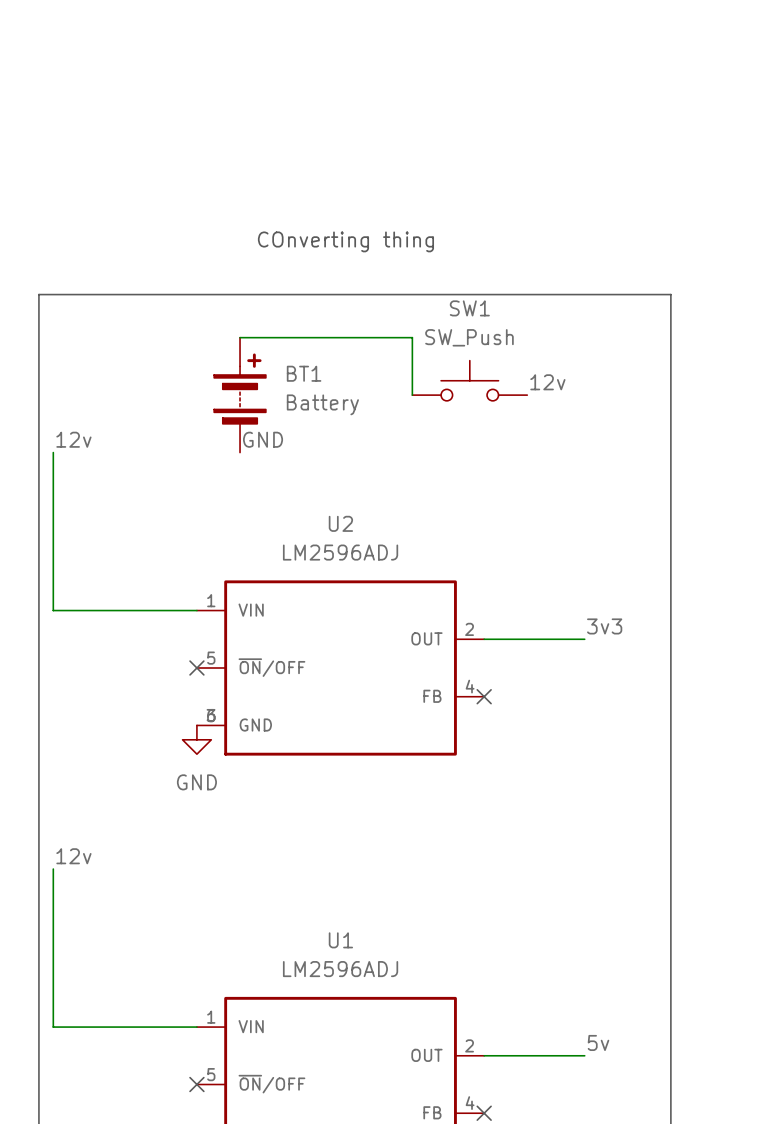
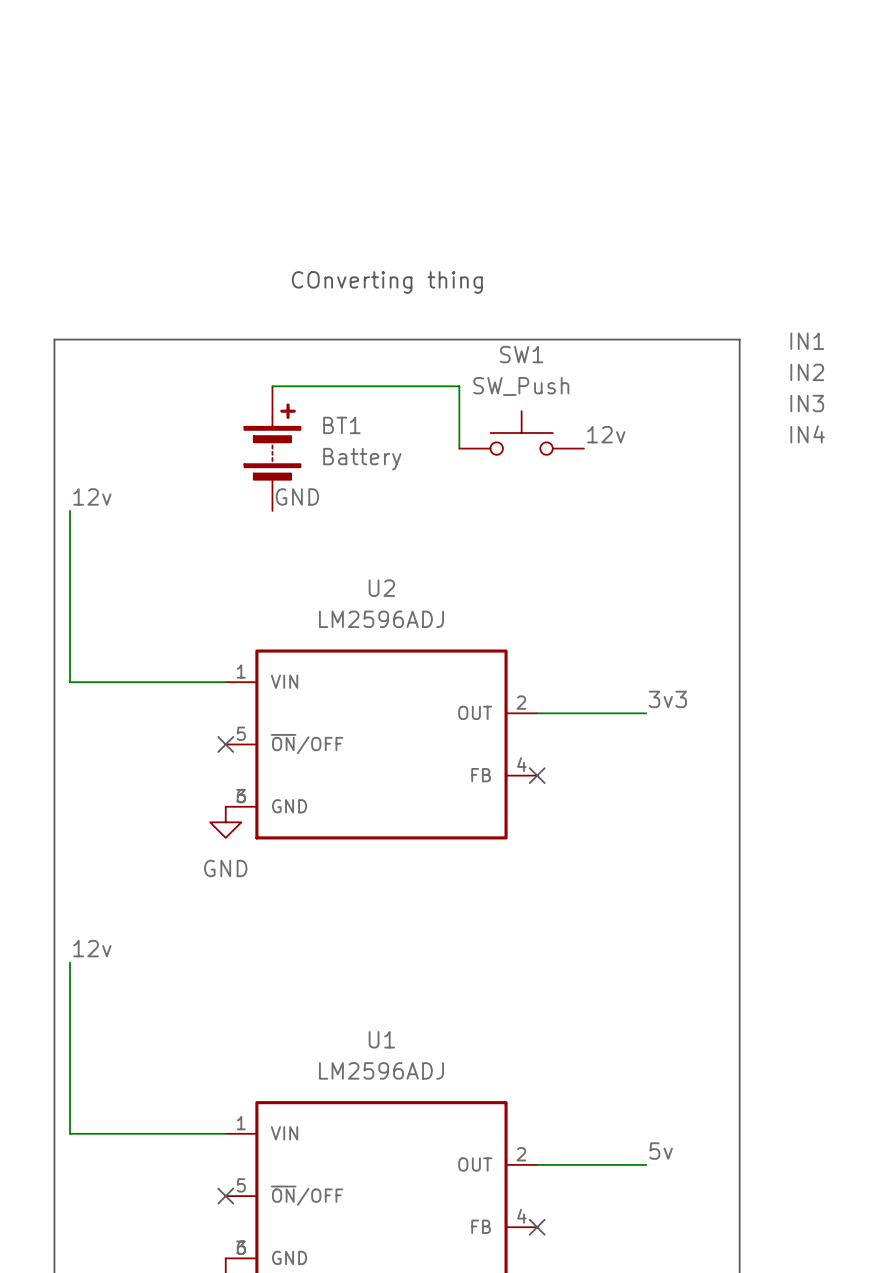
label: none -> IN1 (807, 341)
label: none -> IN2 (807, 372)
label: none -> IN3 (807, 403)
label: none -> IN4 (807, 434)

